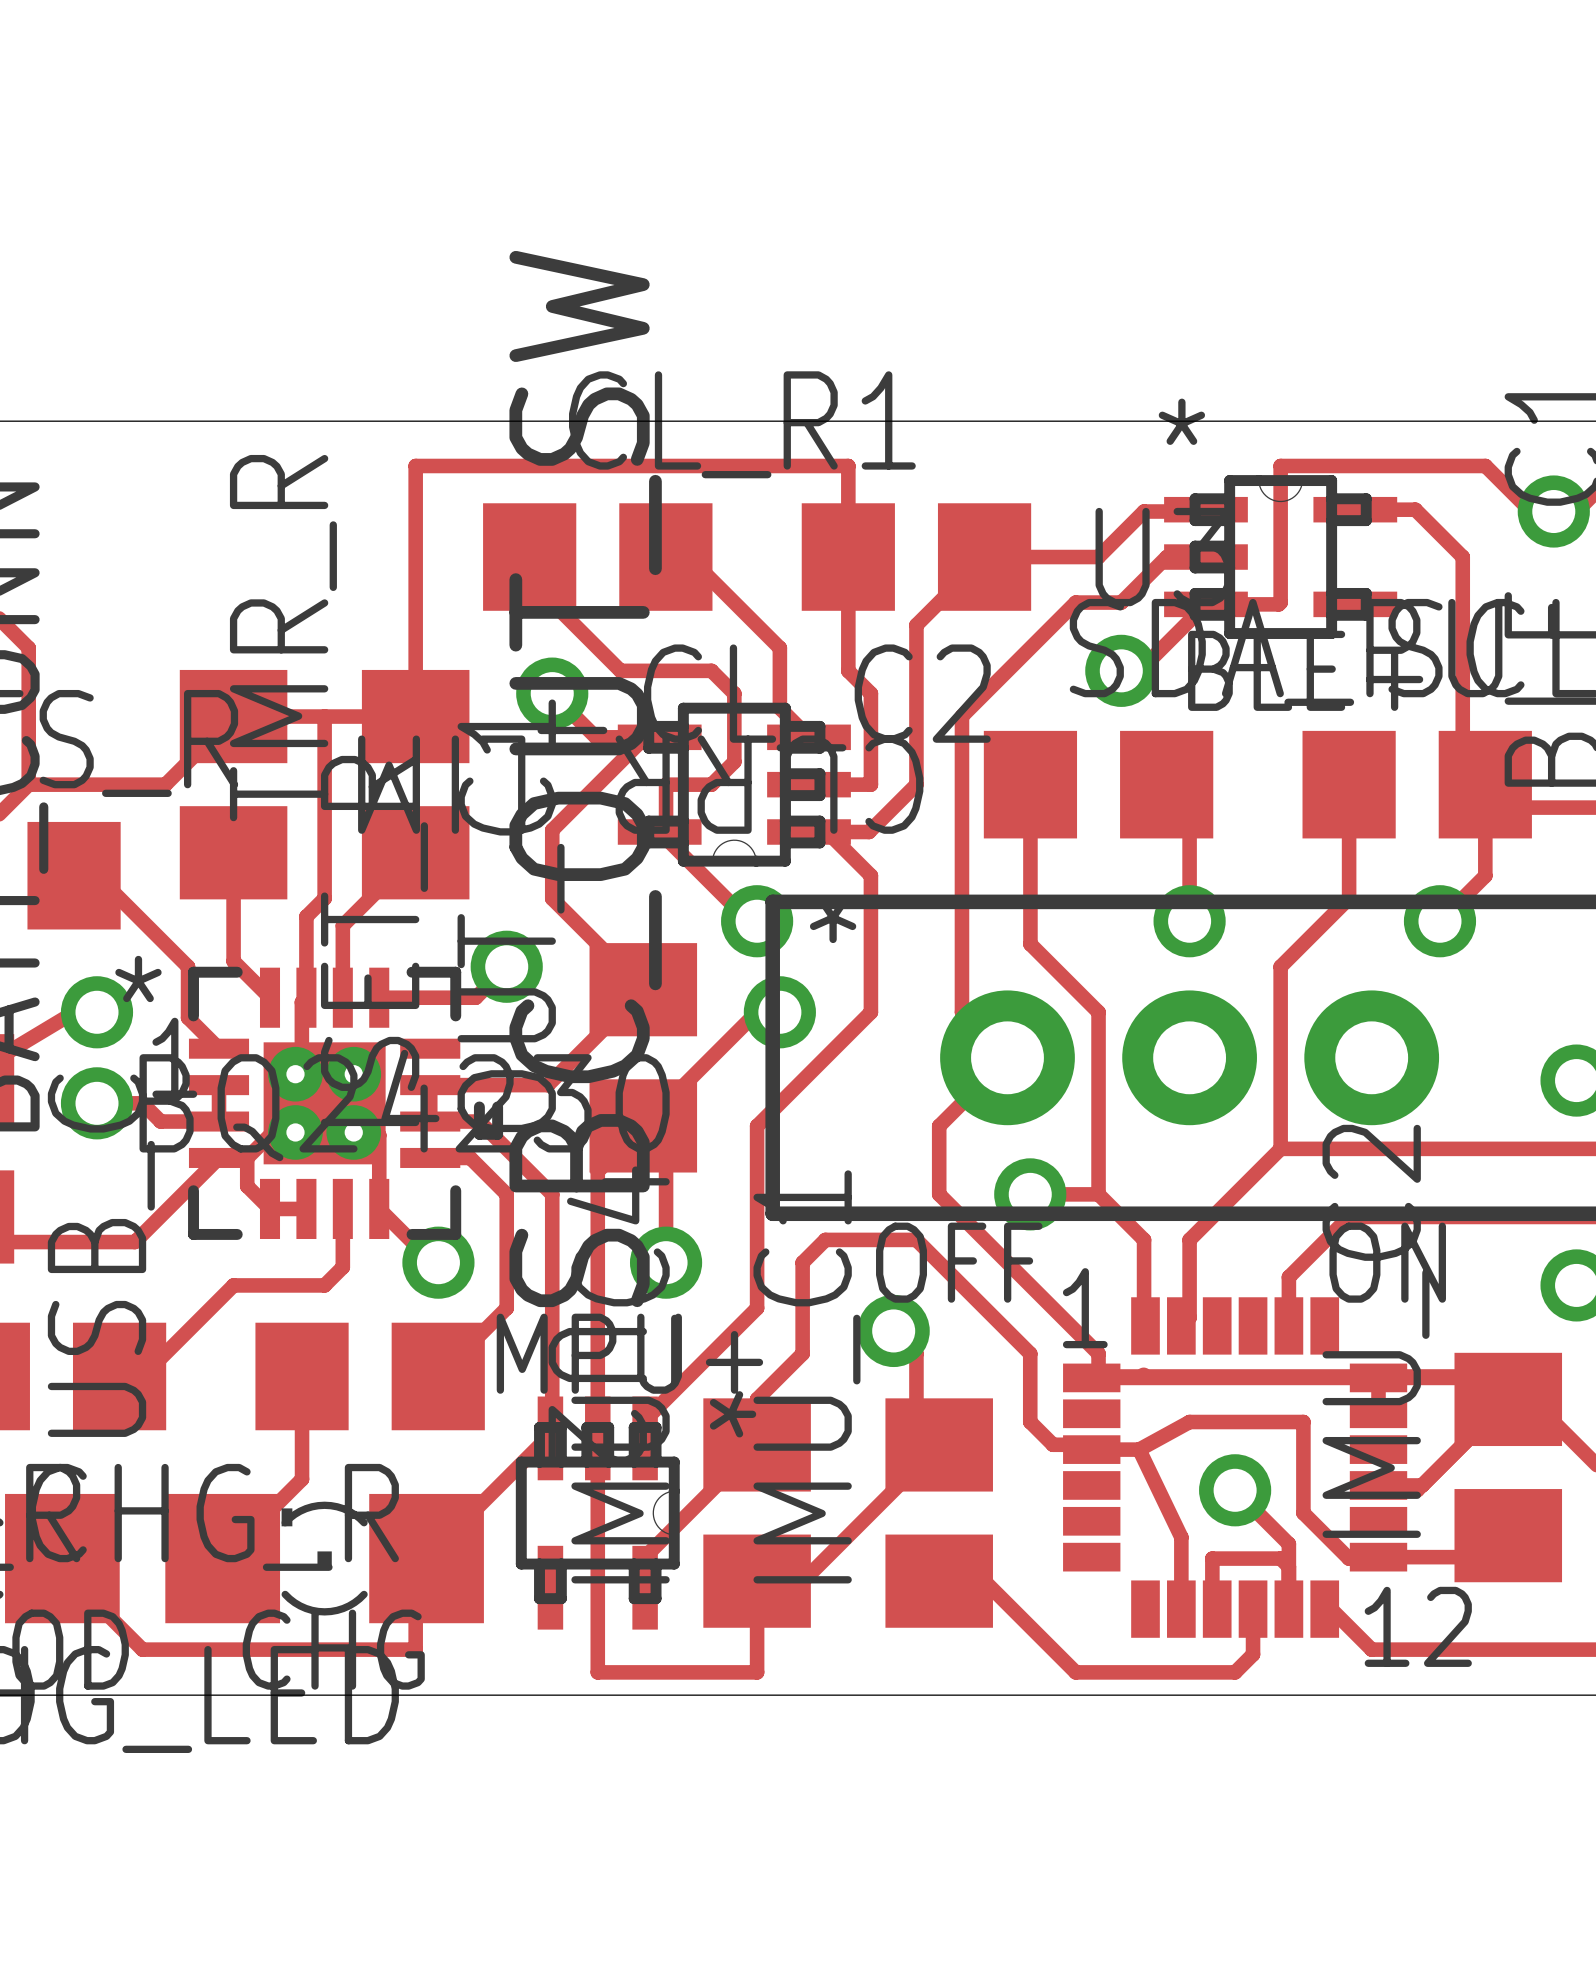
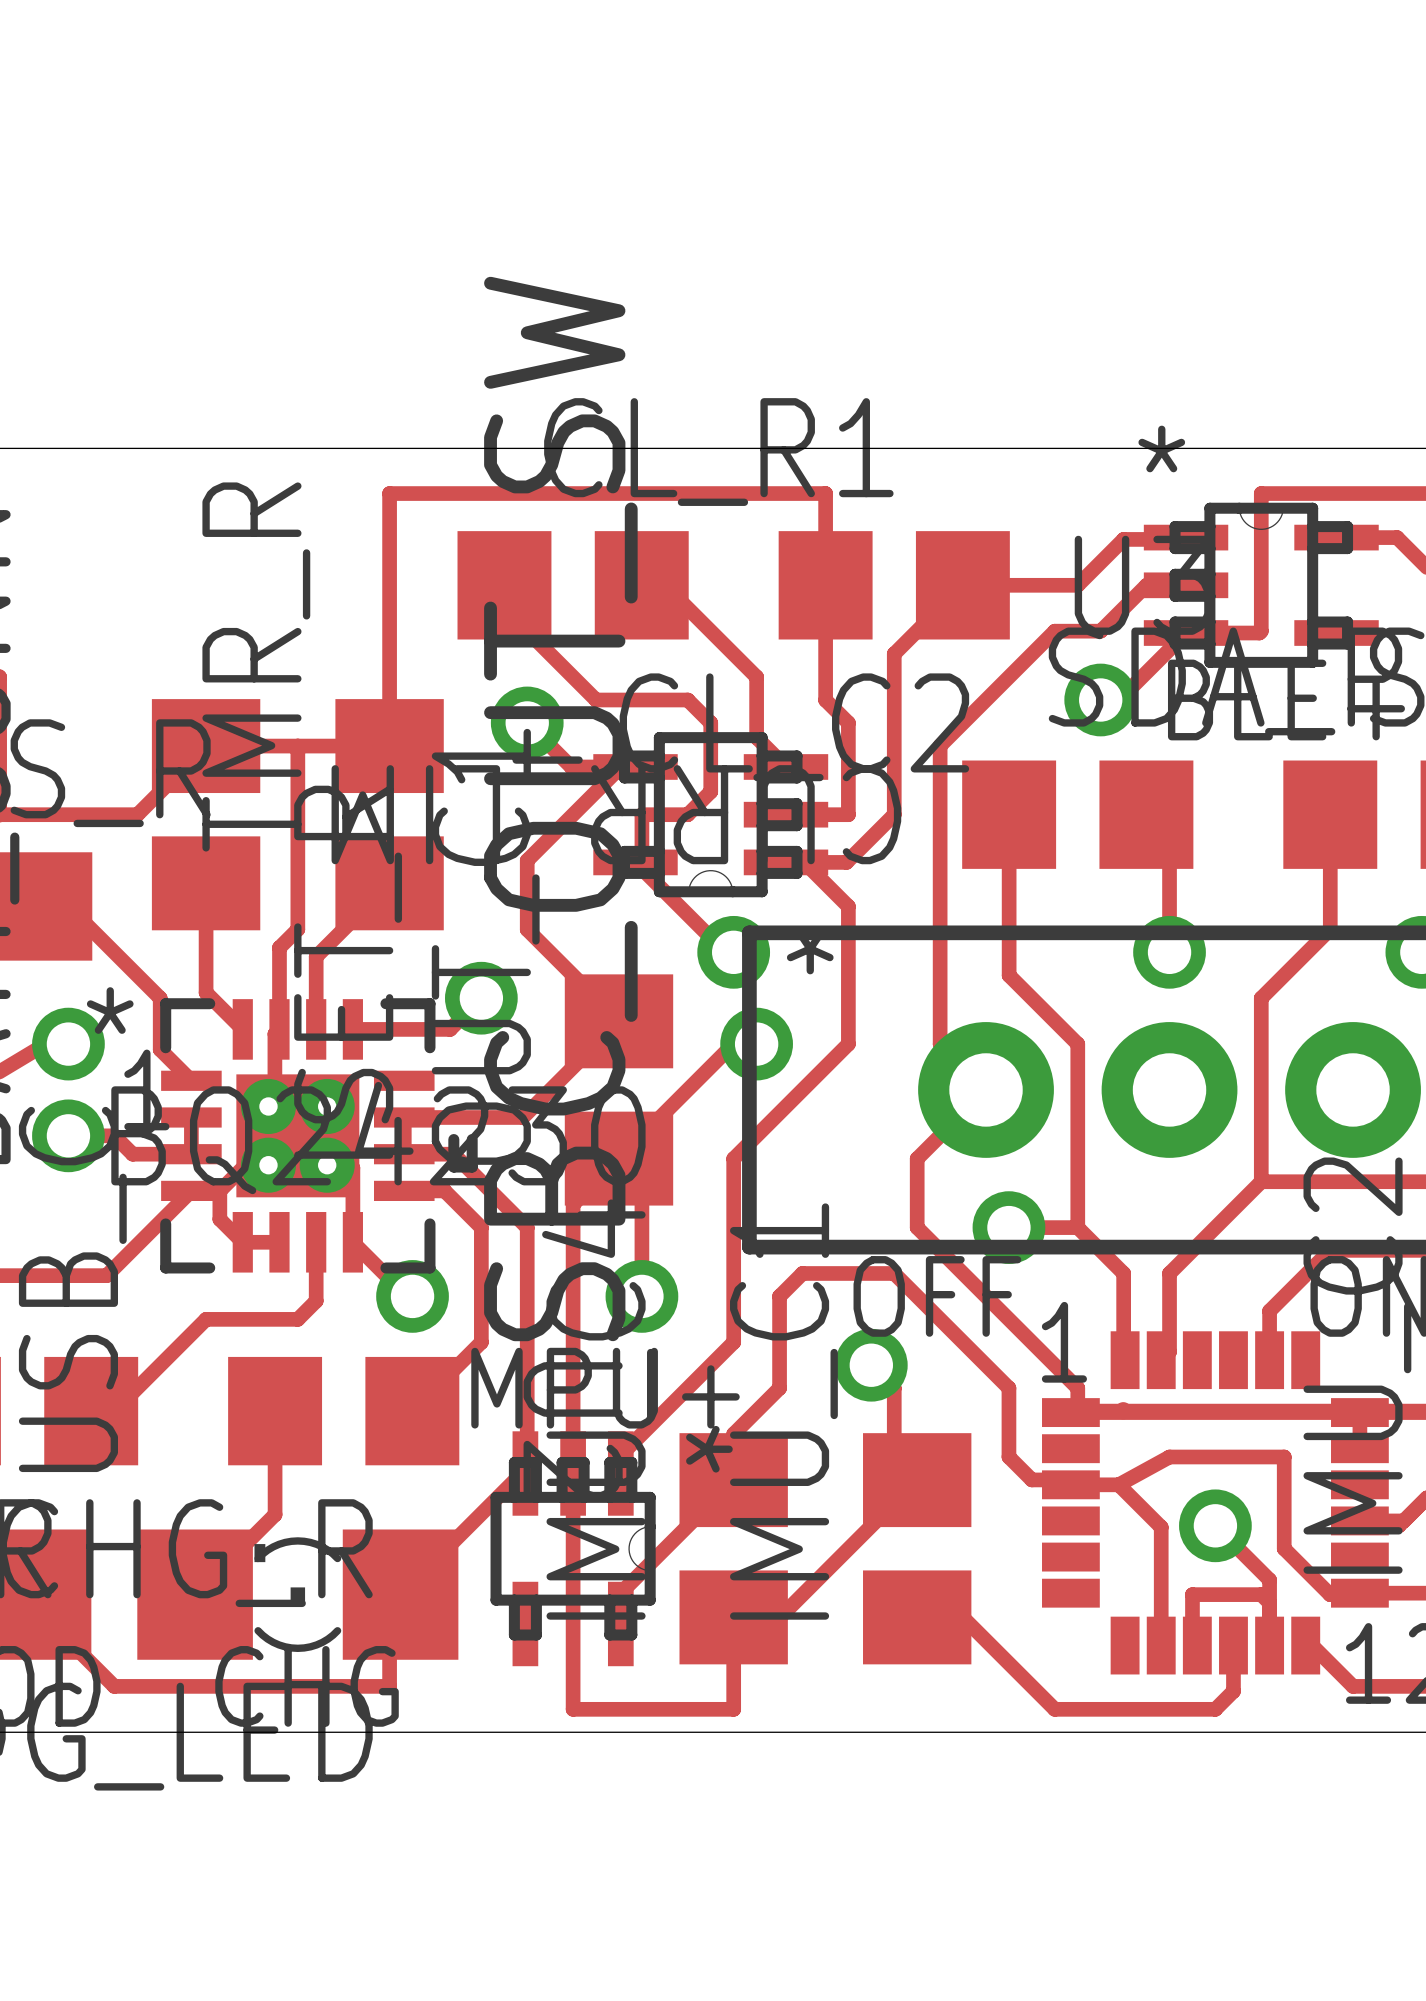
track: (1139, 1449) (1181, 1537) -> (1118, 1484) (1161, 1527) (1161, 1573)

